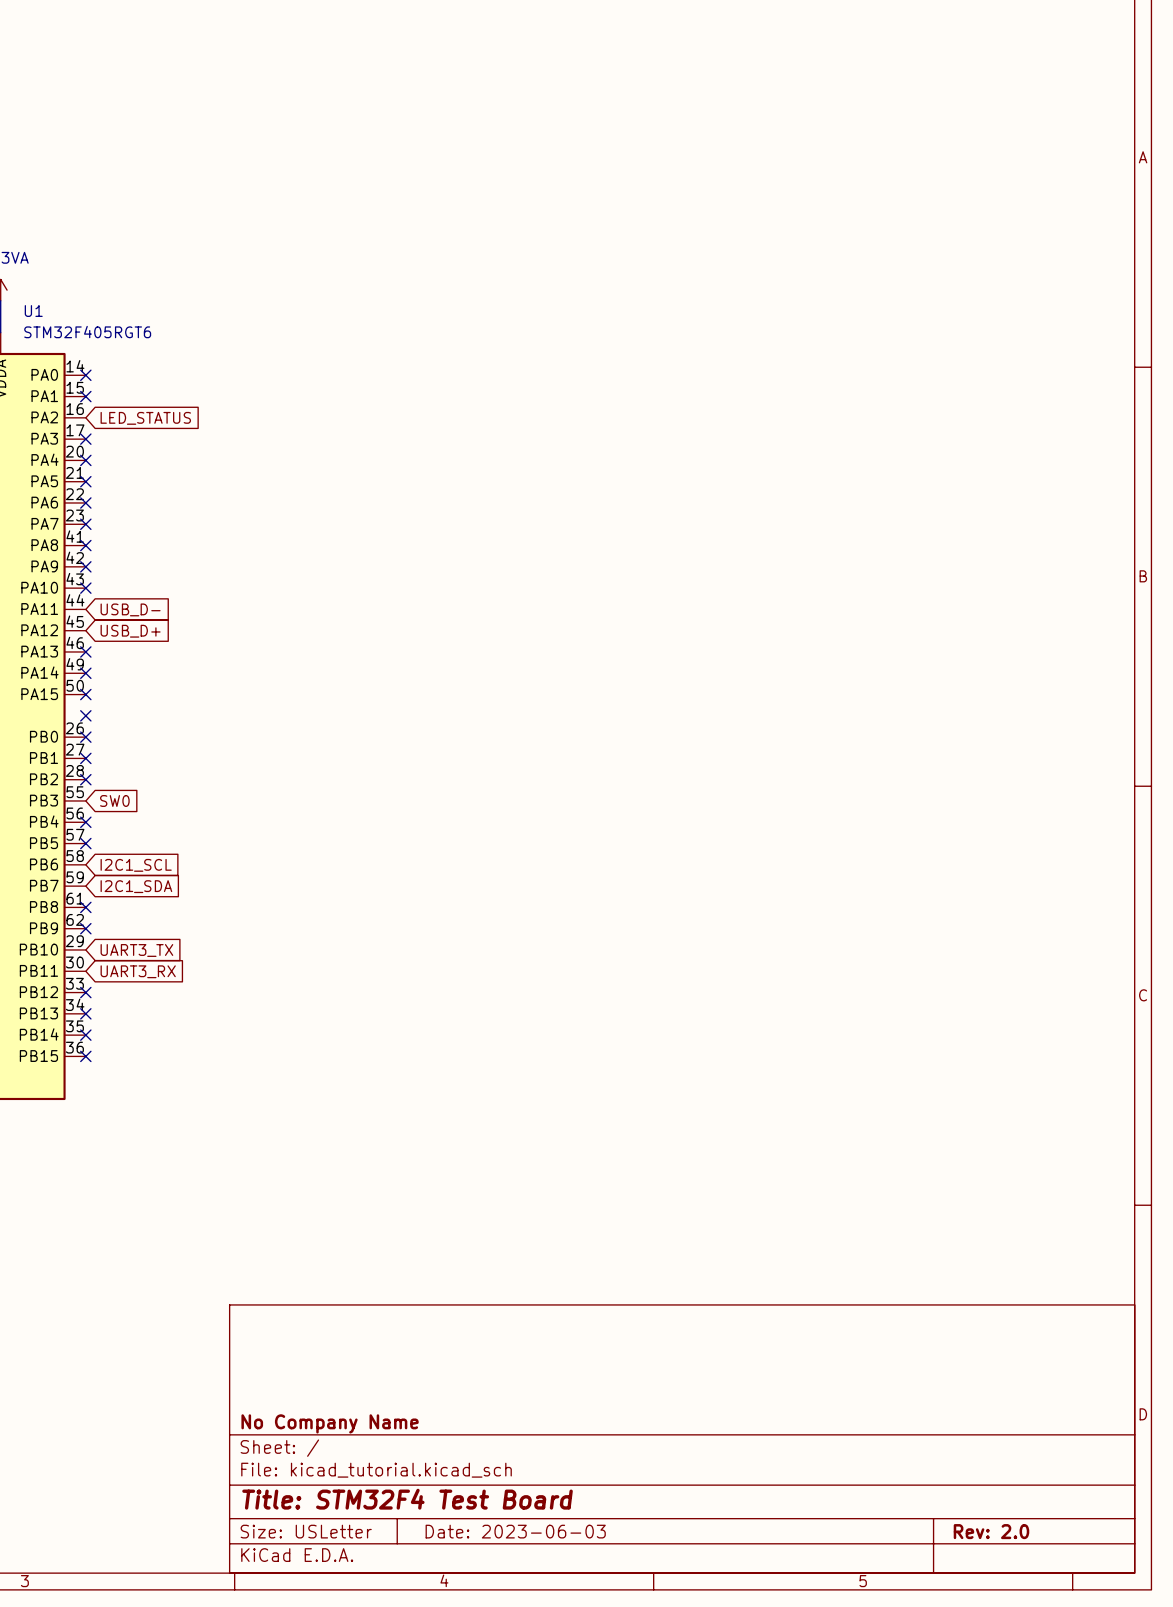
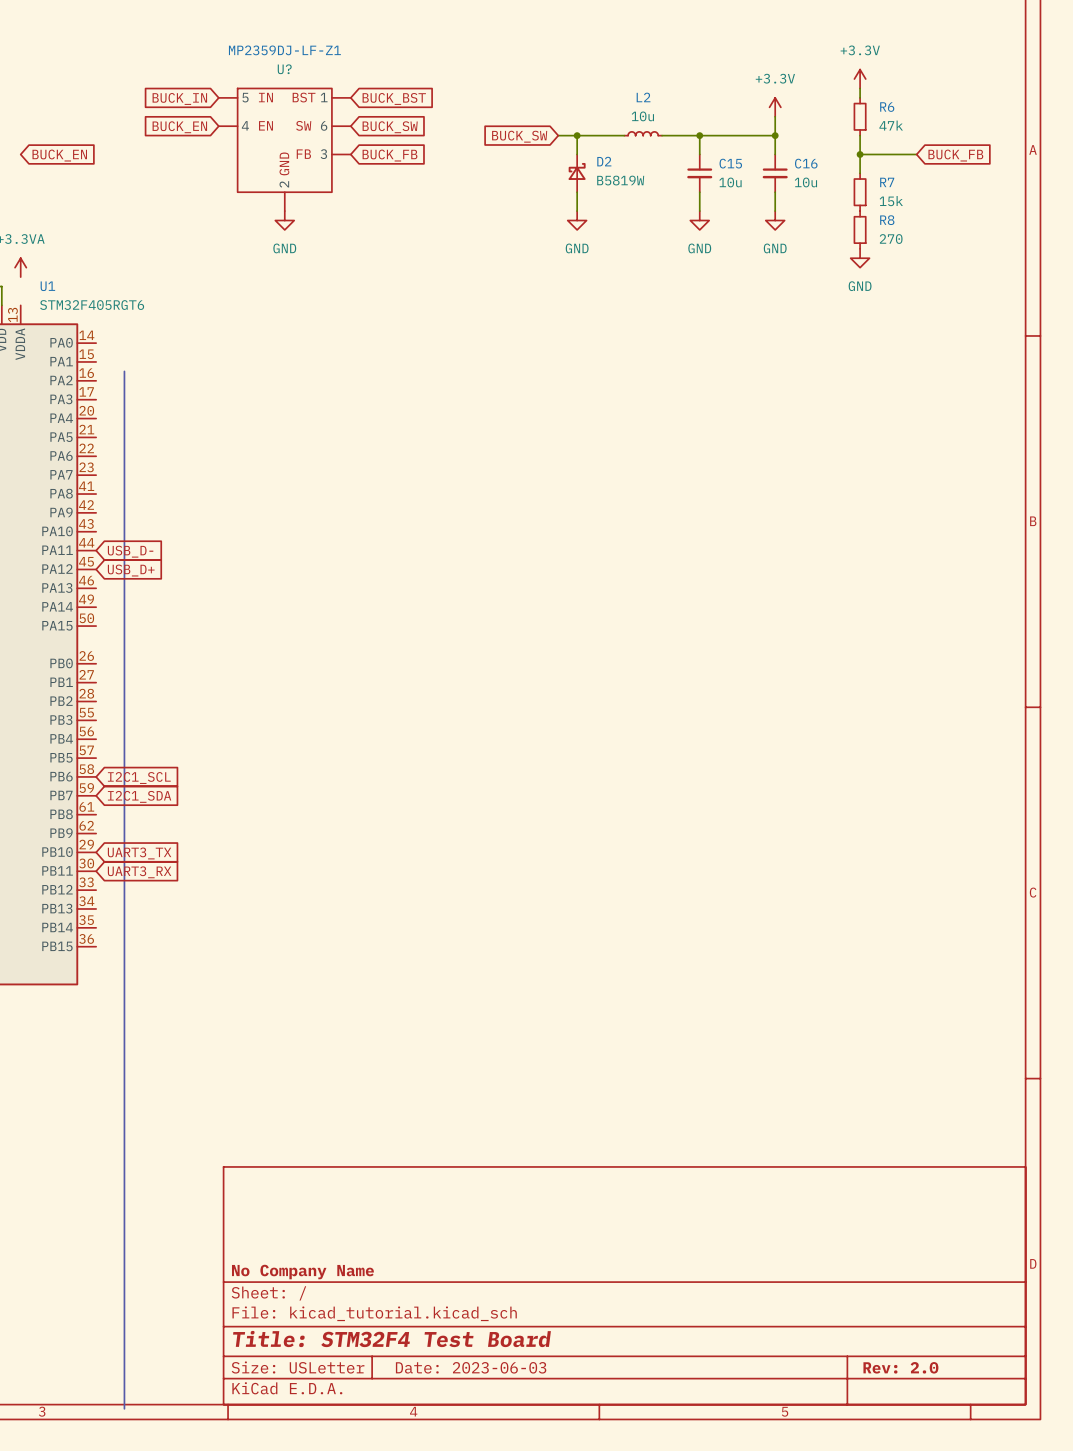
power symbol: none -> +3.3V (860, 79)
wire: none -> (860, 88) (860, 97)
global label: none -> BUCK_IN (179, 98)
global label: none -> BUCK_BST (394, 98)
power symbol: none -> +3.3V (775, 107)
wire: none -> (775, 116) (775, 154)
R6: none -> 47k (860, 116)
global label: none -> BUCK_EN (179, 127)
global label: none -> BUCK_SW (390, 127)
L2: none -> 10u (643, 133)
global label: none -> BUCK_SW (519, 136)
wire: none -> (558, 135) (624, 135)
wire: none -> (577, 135) (577, 154)
junction: none -> (577, 135)
wire: none -> (662, 135) (775, 135)
wire: none -> (699, 135) (699, 154)
junction: none -> (699, 135)
junction: none -> (775, 135)
wire: none -> (860, 135) (860, 173)
MP2359DJ-LF-Z1: none -> U? (284, 149)
global label: none -> BUCK_EN (59, 155)
global label: none -> BUCK_FB (389, 155)
wire: none -> (860, 154) (916, 154)
junction: none -> (860, 154)
global label: none -> BUCK_FB (955, 155)
D2: none -> B5819W (577, 173)
C15: none -> 10u (699, 173)
C16: none -> 10u (775, 173)
wire: none -> (577, 192) (577, 211)
wire: none -> (699, 192) (699, 211)
wire: none -> (775, 192) (775, 211)
R7: none -> 15k (860, 192)
power symbol: none -> GND (284, 220)
power symbol: none -> GND (577, 220)
power symbol: none -> GND (699, 220)
power symbol: none -> GND (775, 220)
R8: none -> 270 (860, 229)
power symbol: none -> GND (860, 258)
wire: (0, 300) (0, 332) -> none
no-connect mark: (85, 375) -> none
no-connect mark: (85, 396) -> none
line: none -> (124, 371) (124, 1408)
global label: LED_STATUS (145, 418) -> none
no-connect mark: (85, 439) -> none
no-connect mark: (85, 460) -> none
no-connect mark: (85, 481) -> none
no-connect mark: (85, 502) -> none
no-connect mark: (85, 524) -> none
no-connect mark: (85, 545) -> none
no-connect mark: (85, 566) -> none
no-connect mark: (85, 588) -> none
no-connect mark: (85, 651) -> none
no-connect mark: (85, 673) -> none
no-connect mark: (85, 694) -> none
no-connect mark: (85, 715) -> none
no-connect mark: (85, 737) -> none
no-connect mark: (85, 758) -> none
no-connect mark: (85, 779) -> none
global label: SW0 (114, 800) -> none
no-connect mark: (85, 822) -> none
no-connect mark: (85, 843) -> none
no-connect mark: (85, 907) -> none
no-connect mark: (85, 928) -> none
no-connect mark: (85, 992) -> none
no-connect mark: (85, 1013) -> none
no-connect mark: (85, 1035) -> none
no-connect mark: (85, 1056) -> none

